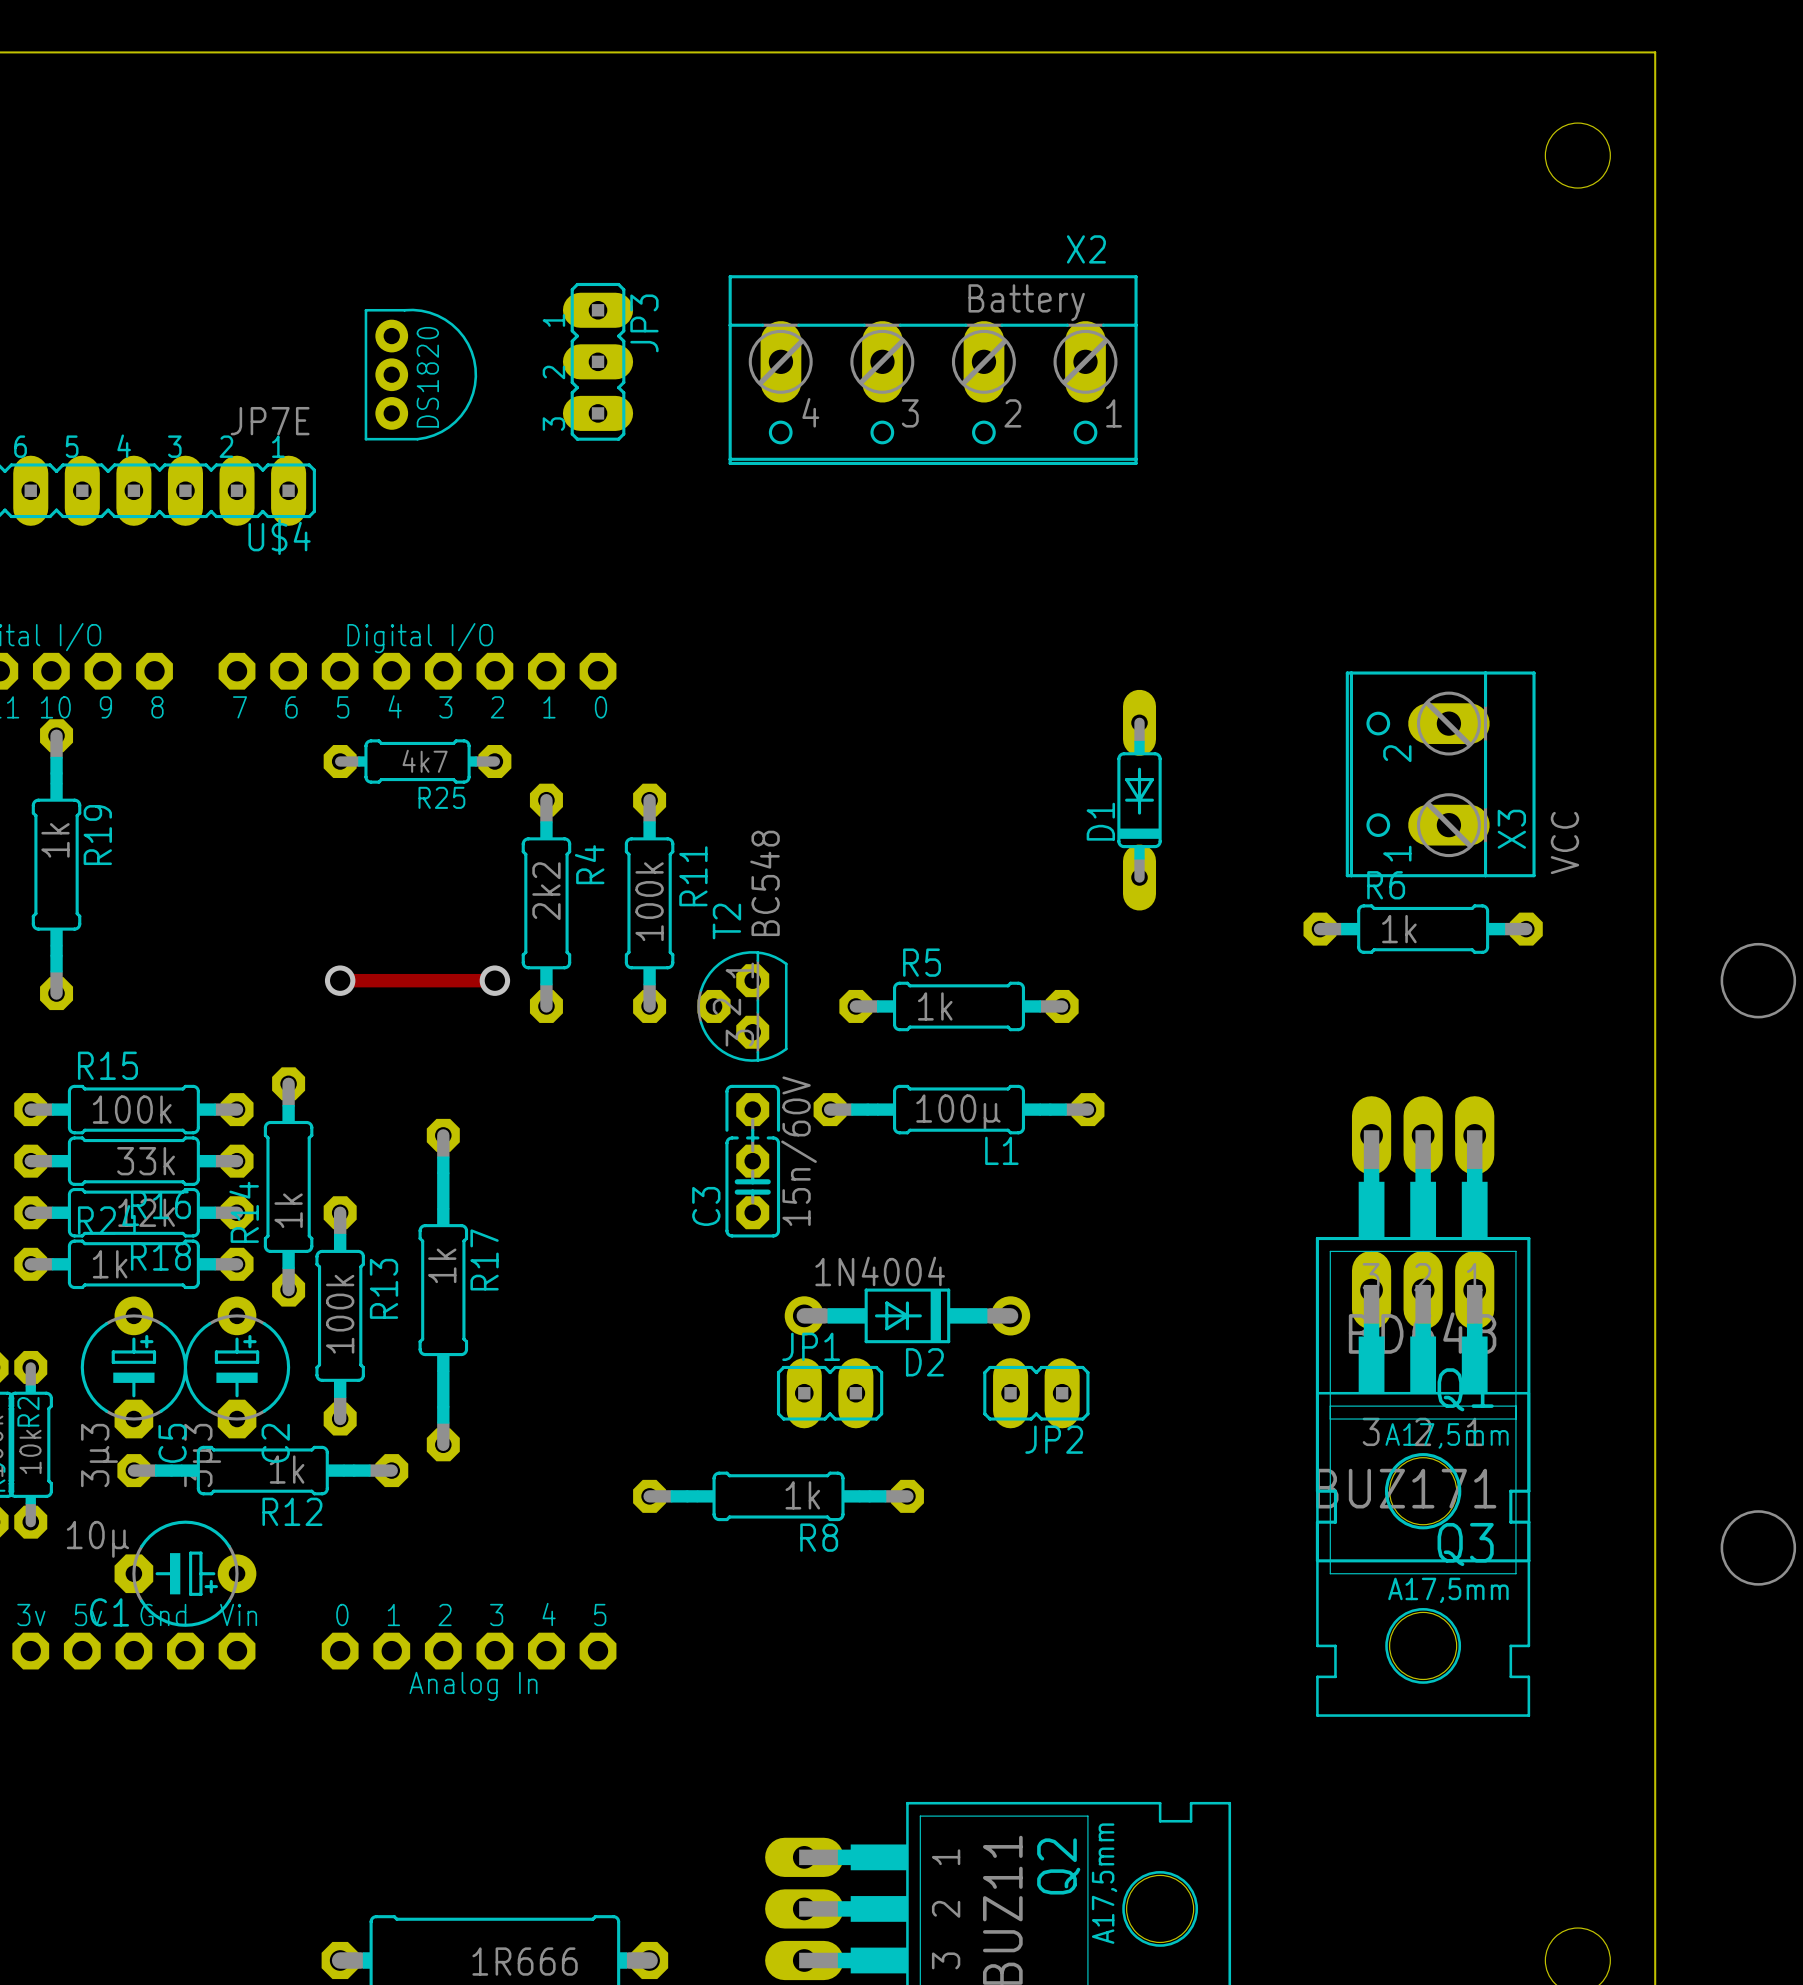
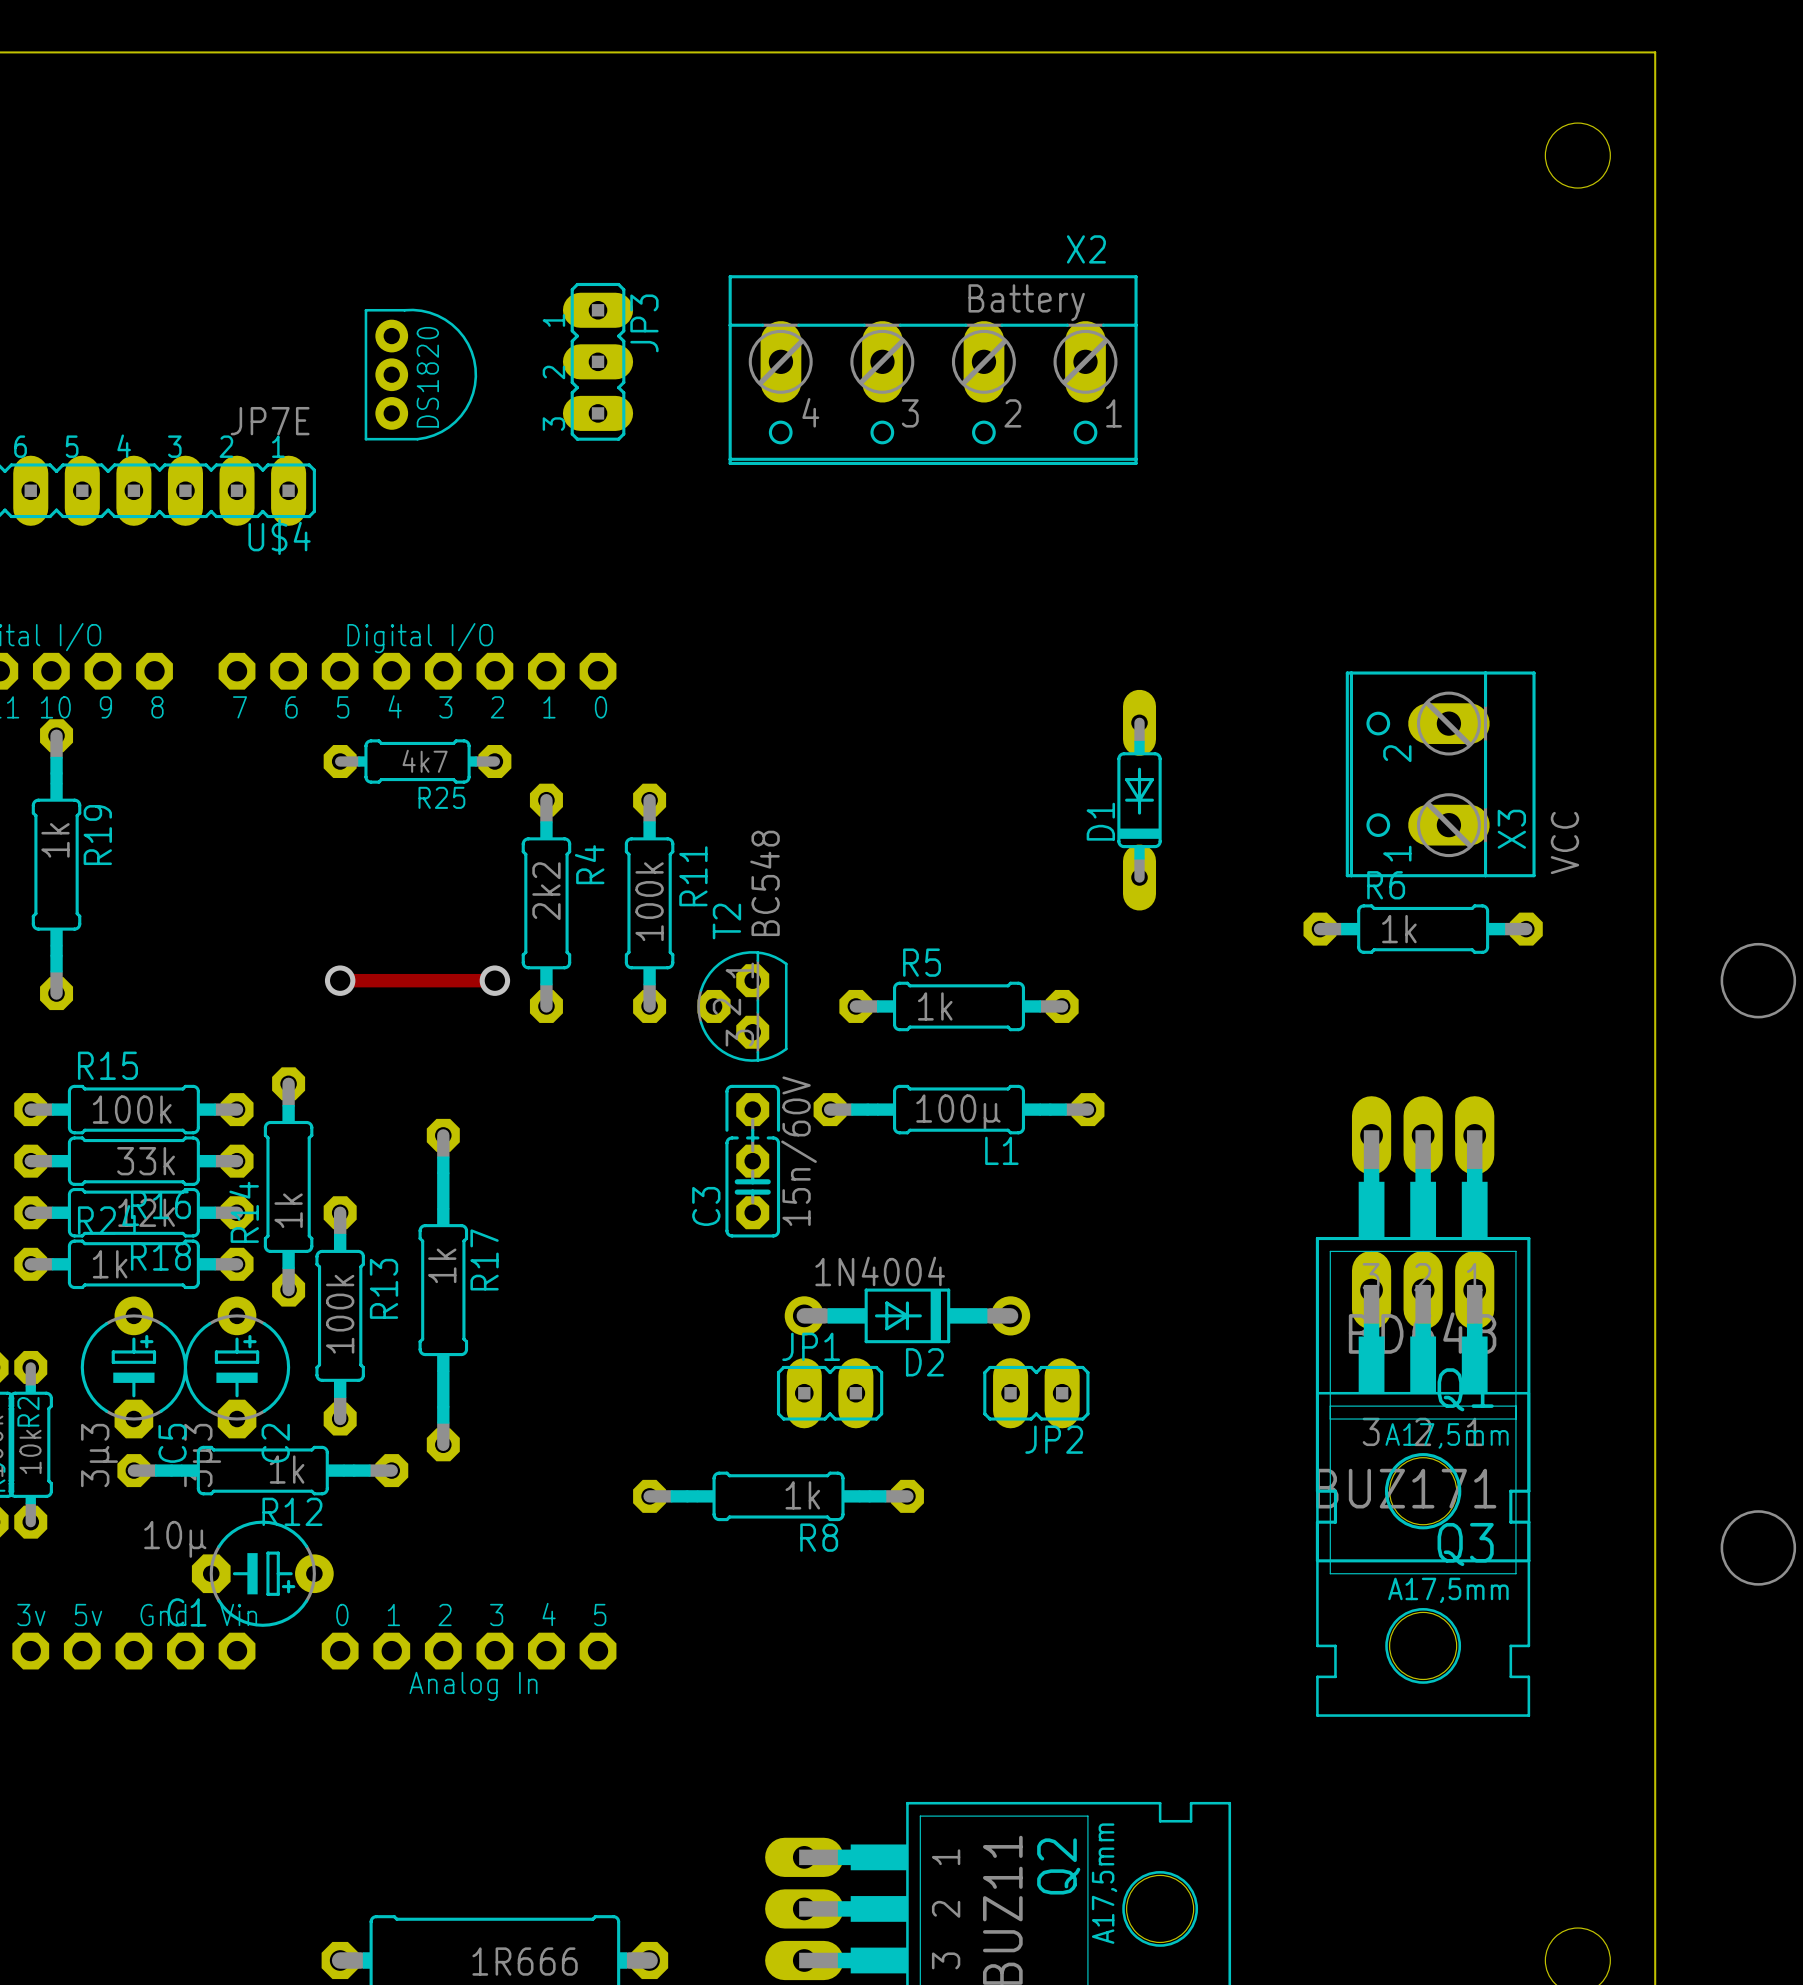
C1 position: (185, 1573) -> (262, 1573)

